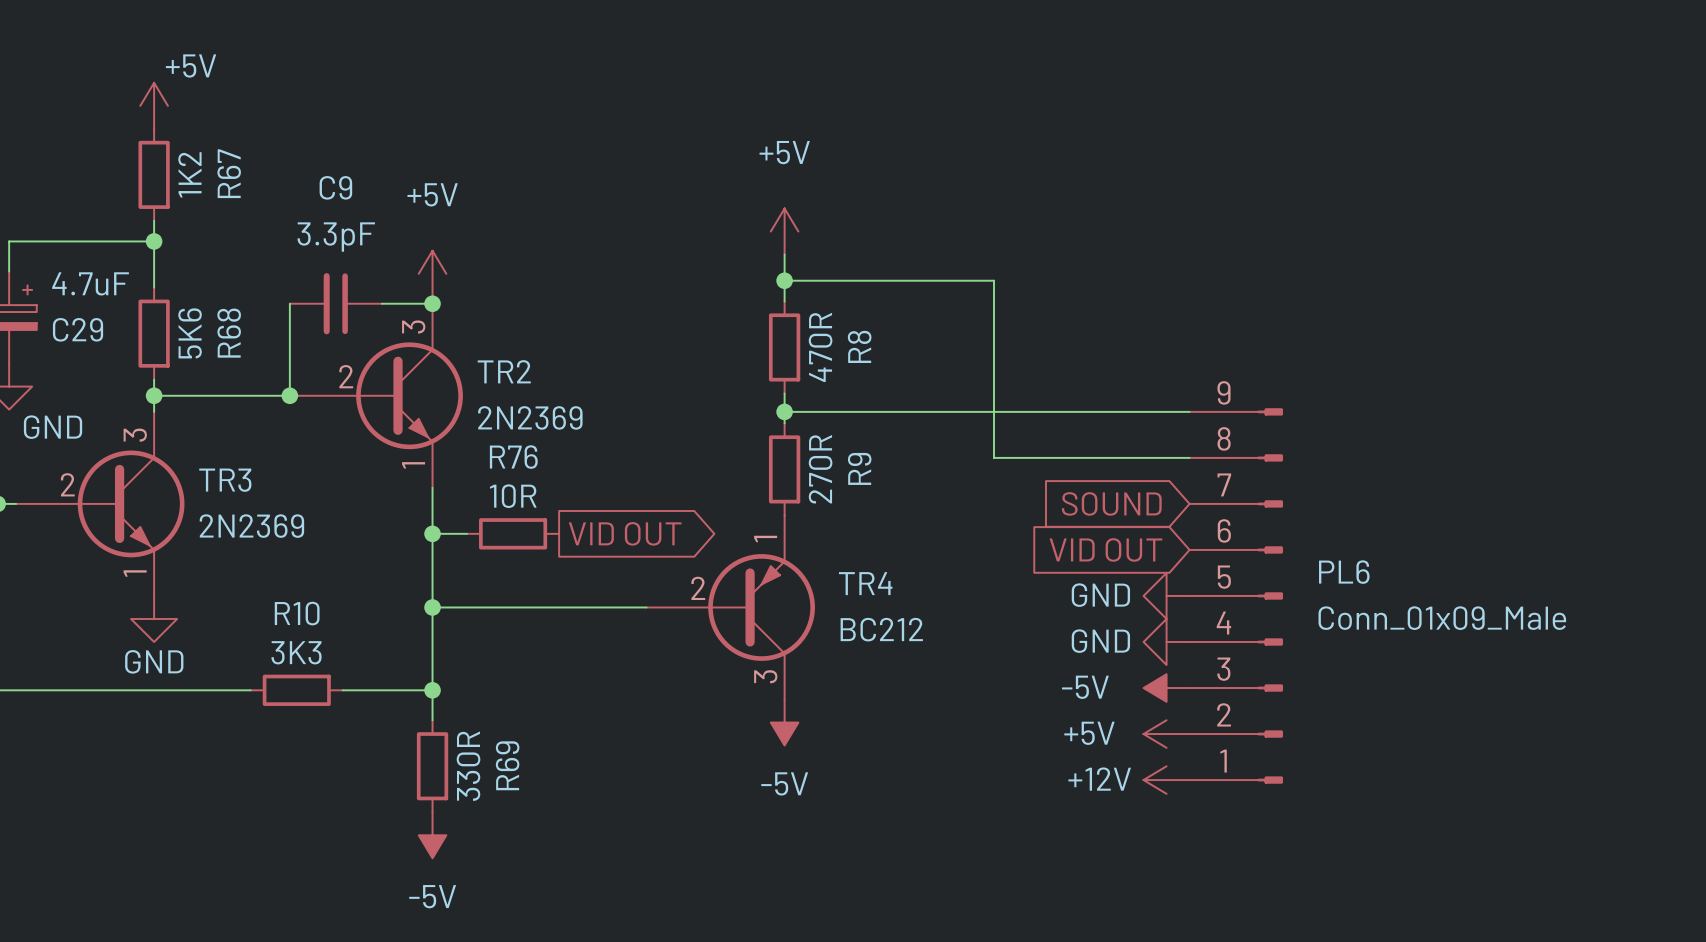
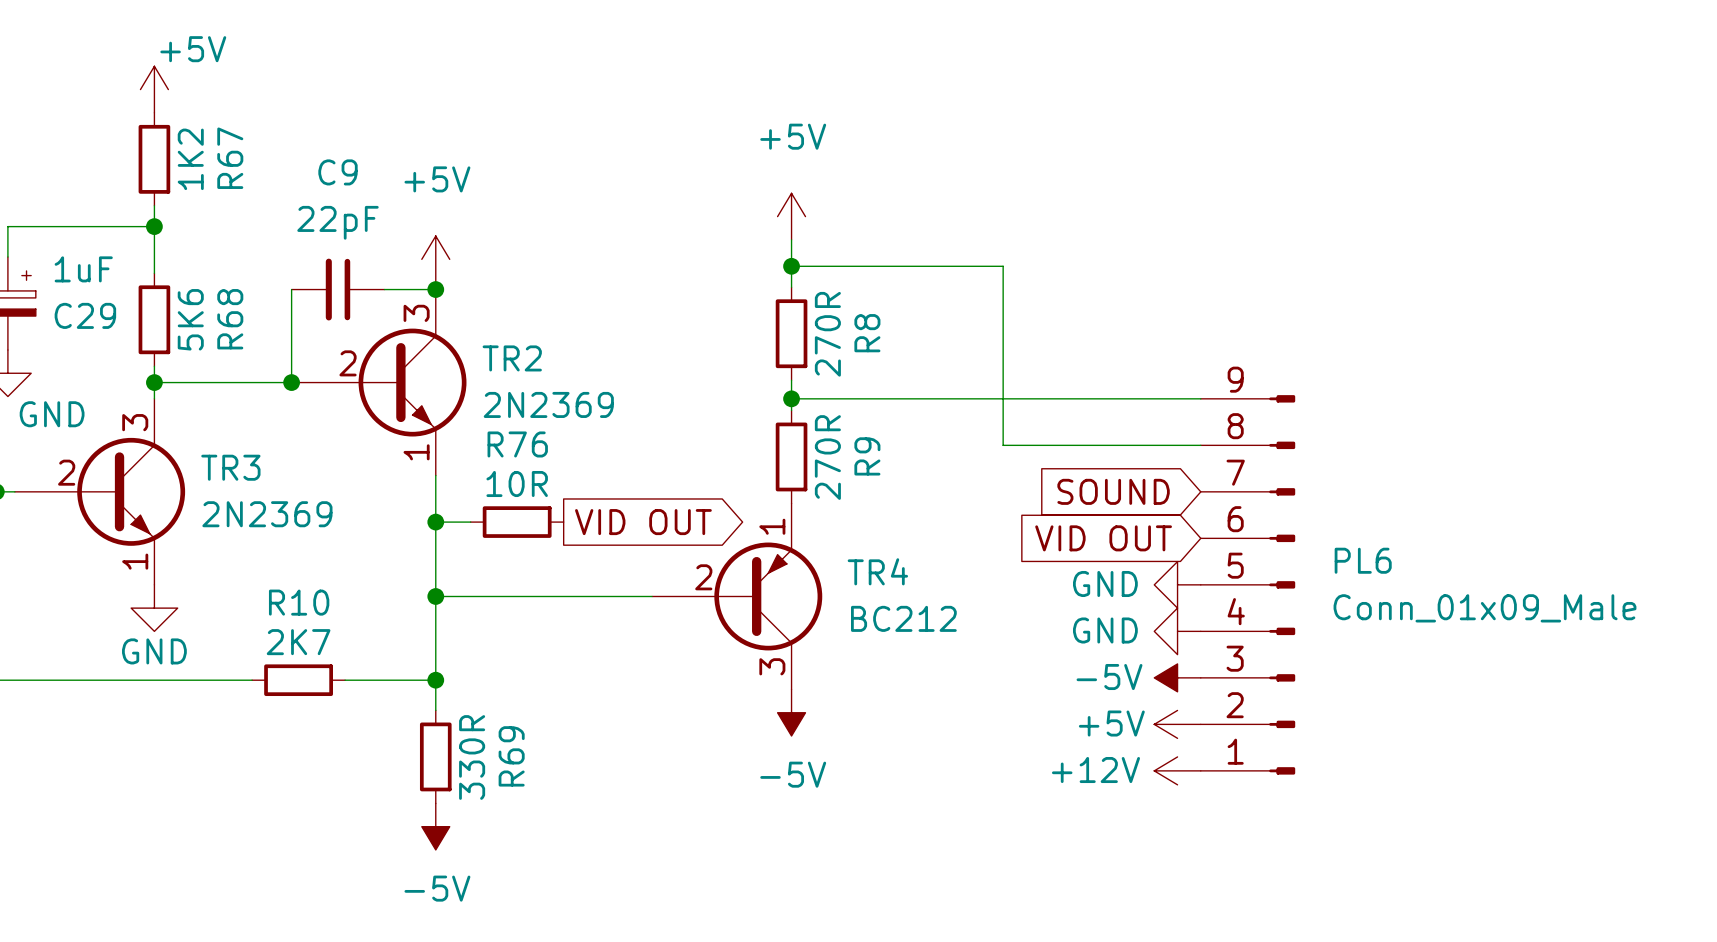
C9 value: 3.3pF (336, 237) -> 22pF (337, 222)
C29 value: 4.7uF (90, 283) -> 1uF (83, 269)
R8 value: 470R (820, 347) -> 270R (827, 334)
R10 value: 3K3 (296, 652) -> 2K7 (298, 642)

